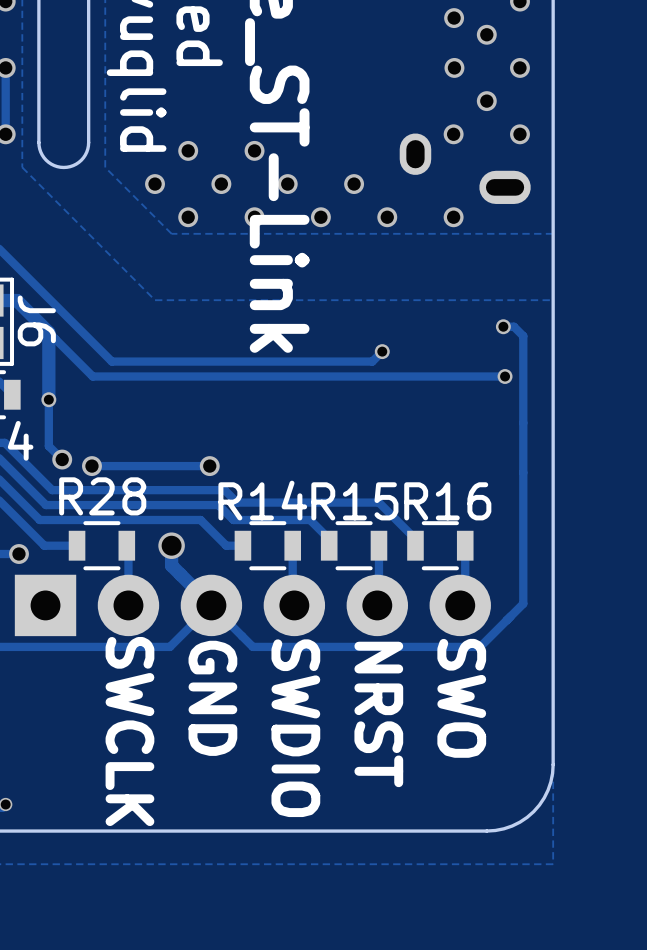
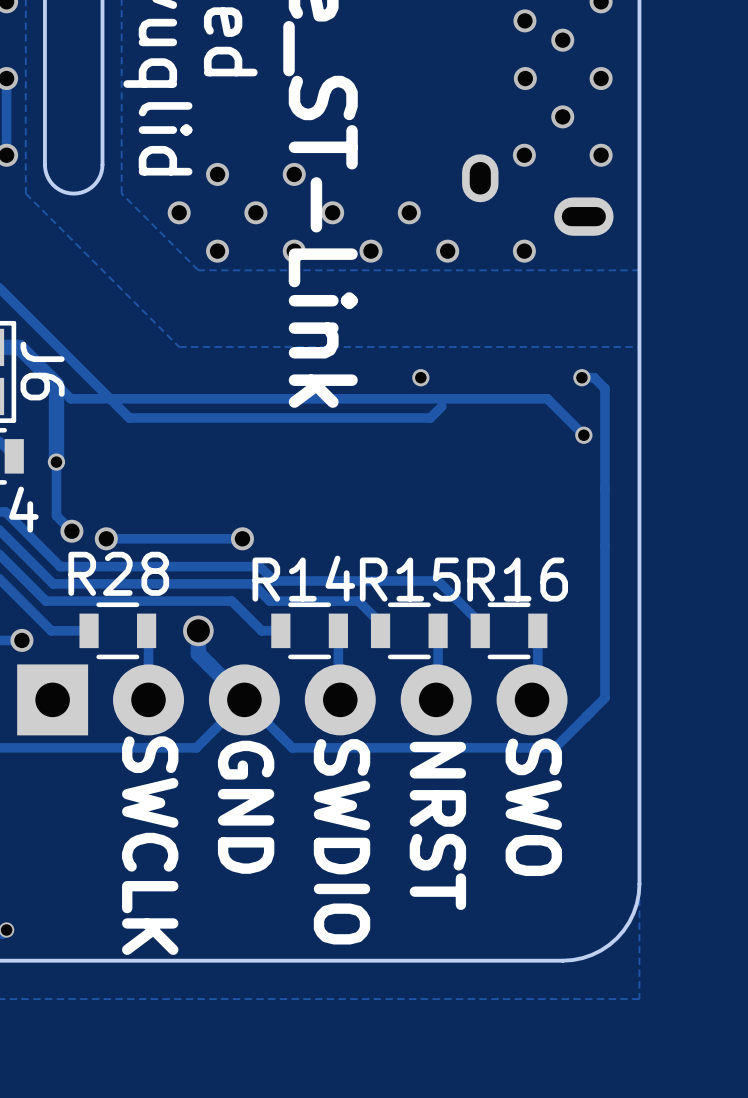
track: (61, 344) (92, 376) (505, 376) -> (70, 398) (547, 398) (583, 435)
via position: (382, 351) -> (420, 377)

